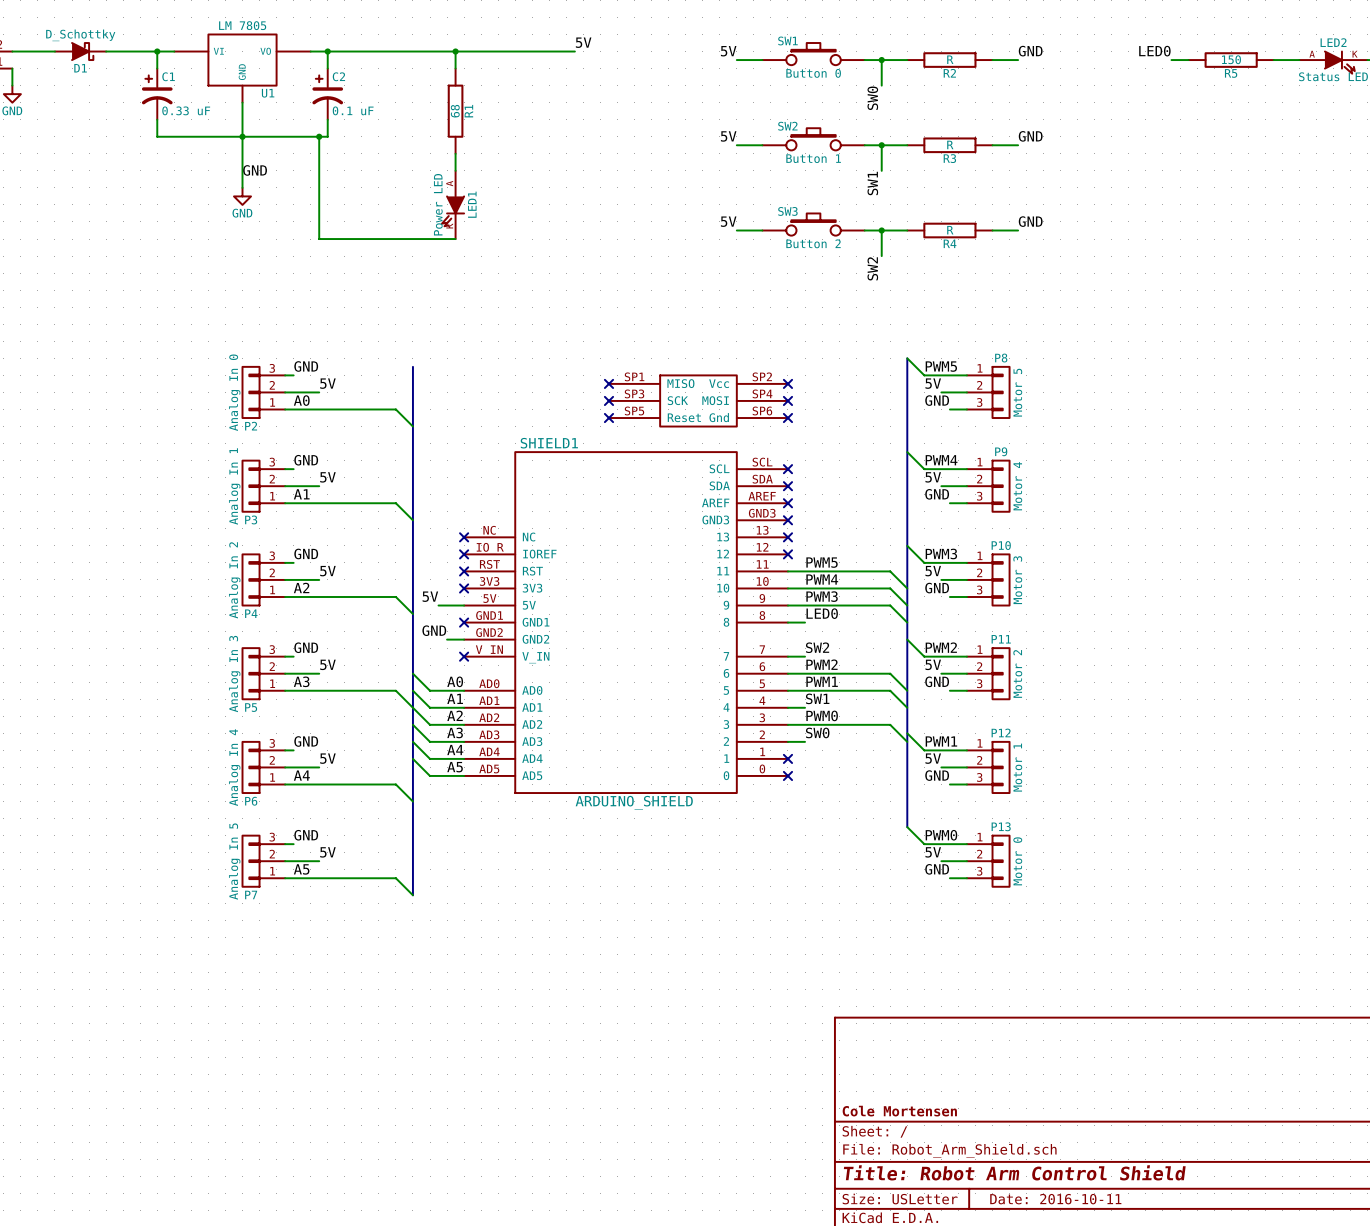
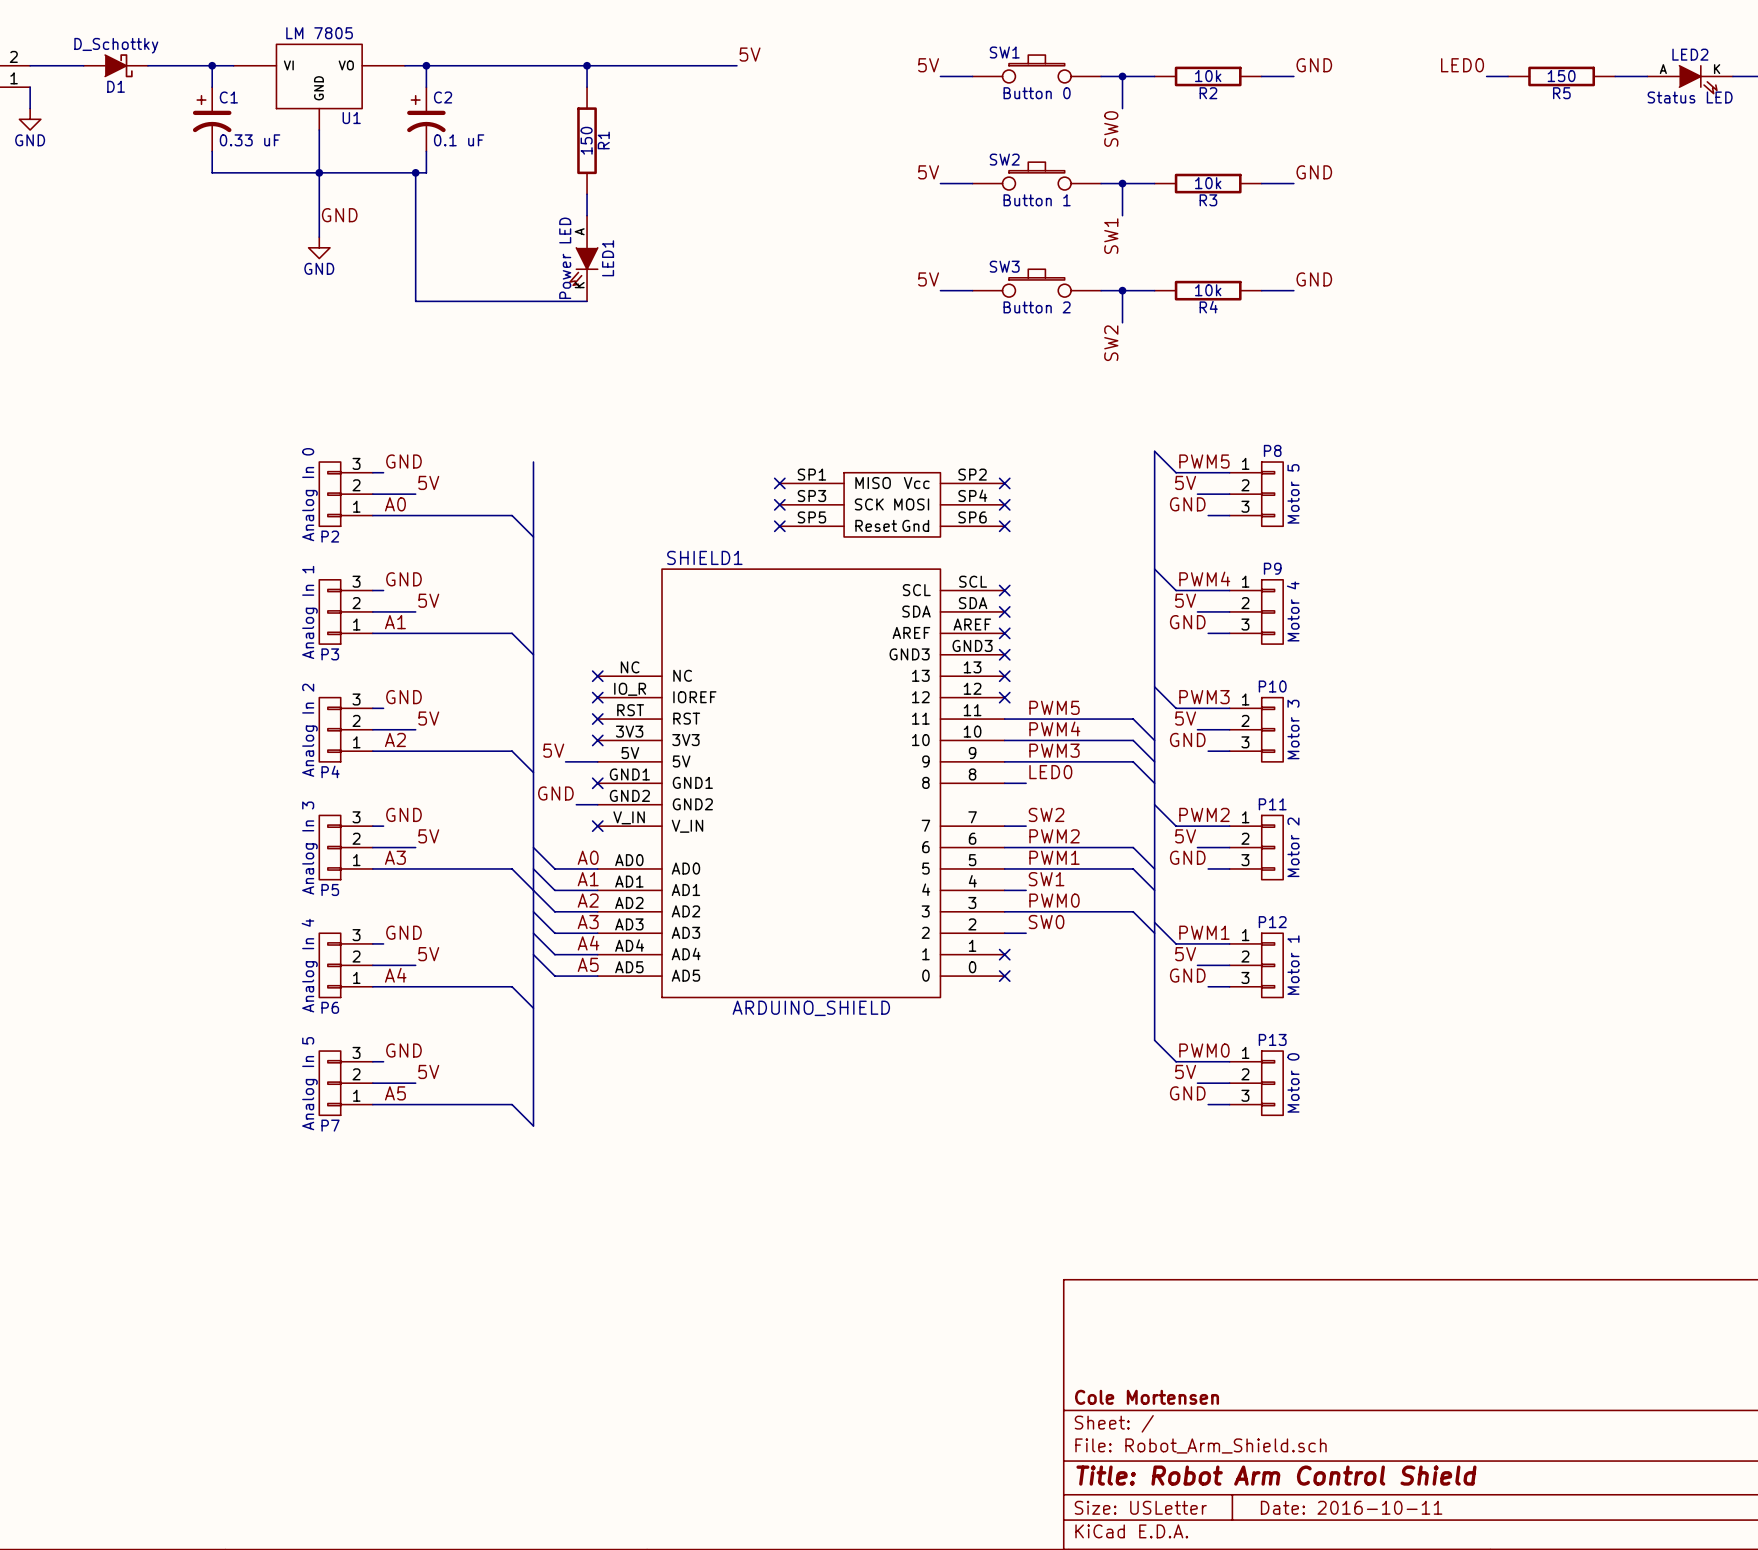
R2 value: R (950, 59) -> 10k (1208, 76)
R1 value: 68 (455, 111) -> 150 (586, 140)
R3 value: R (950, 144) -> 10k (1208, 183)
R4 value: R (950, 230) -> 10k (1208, 290)

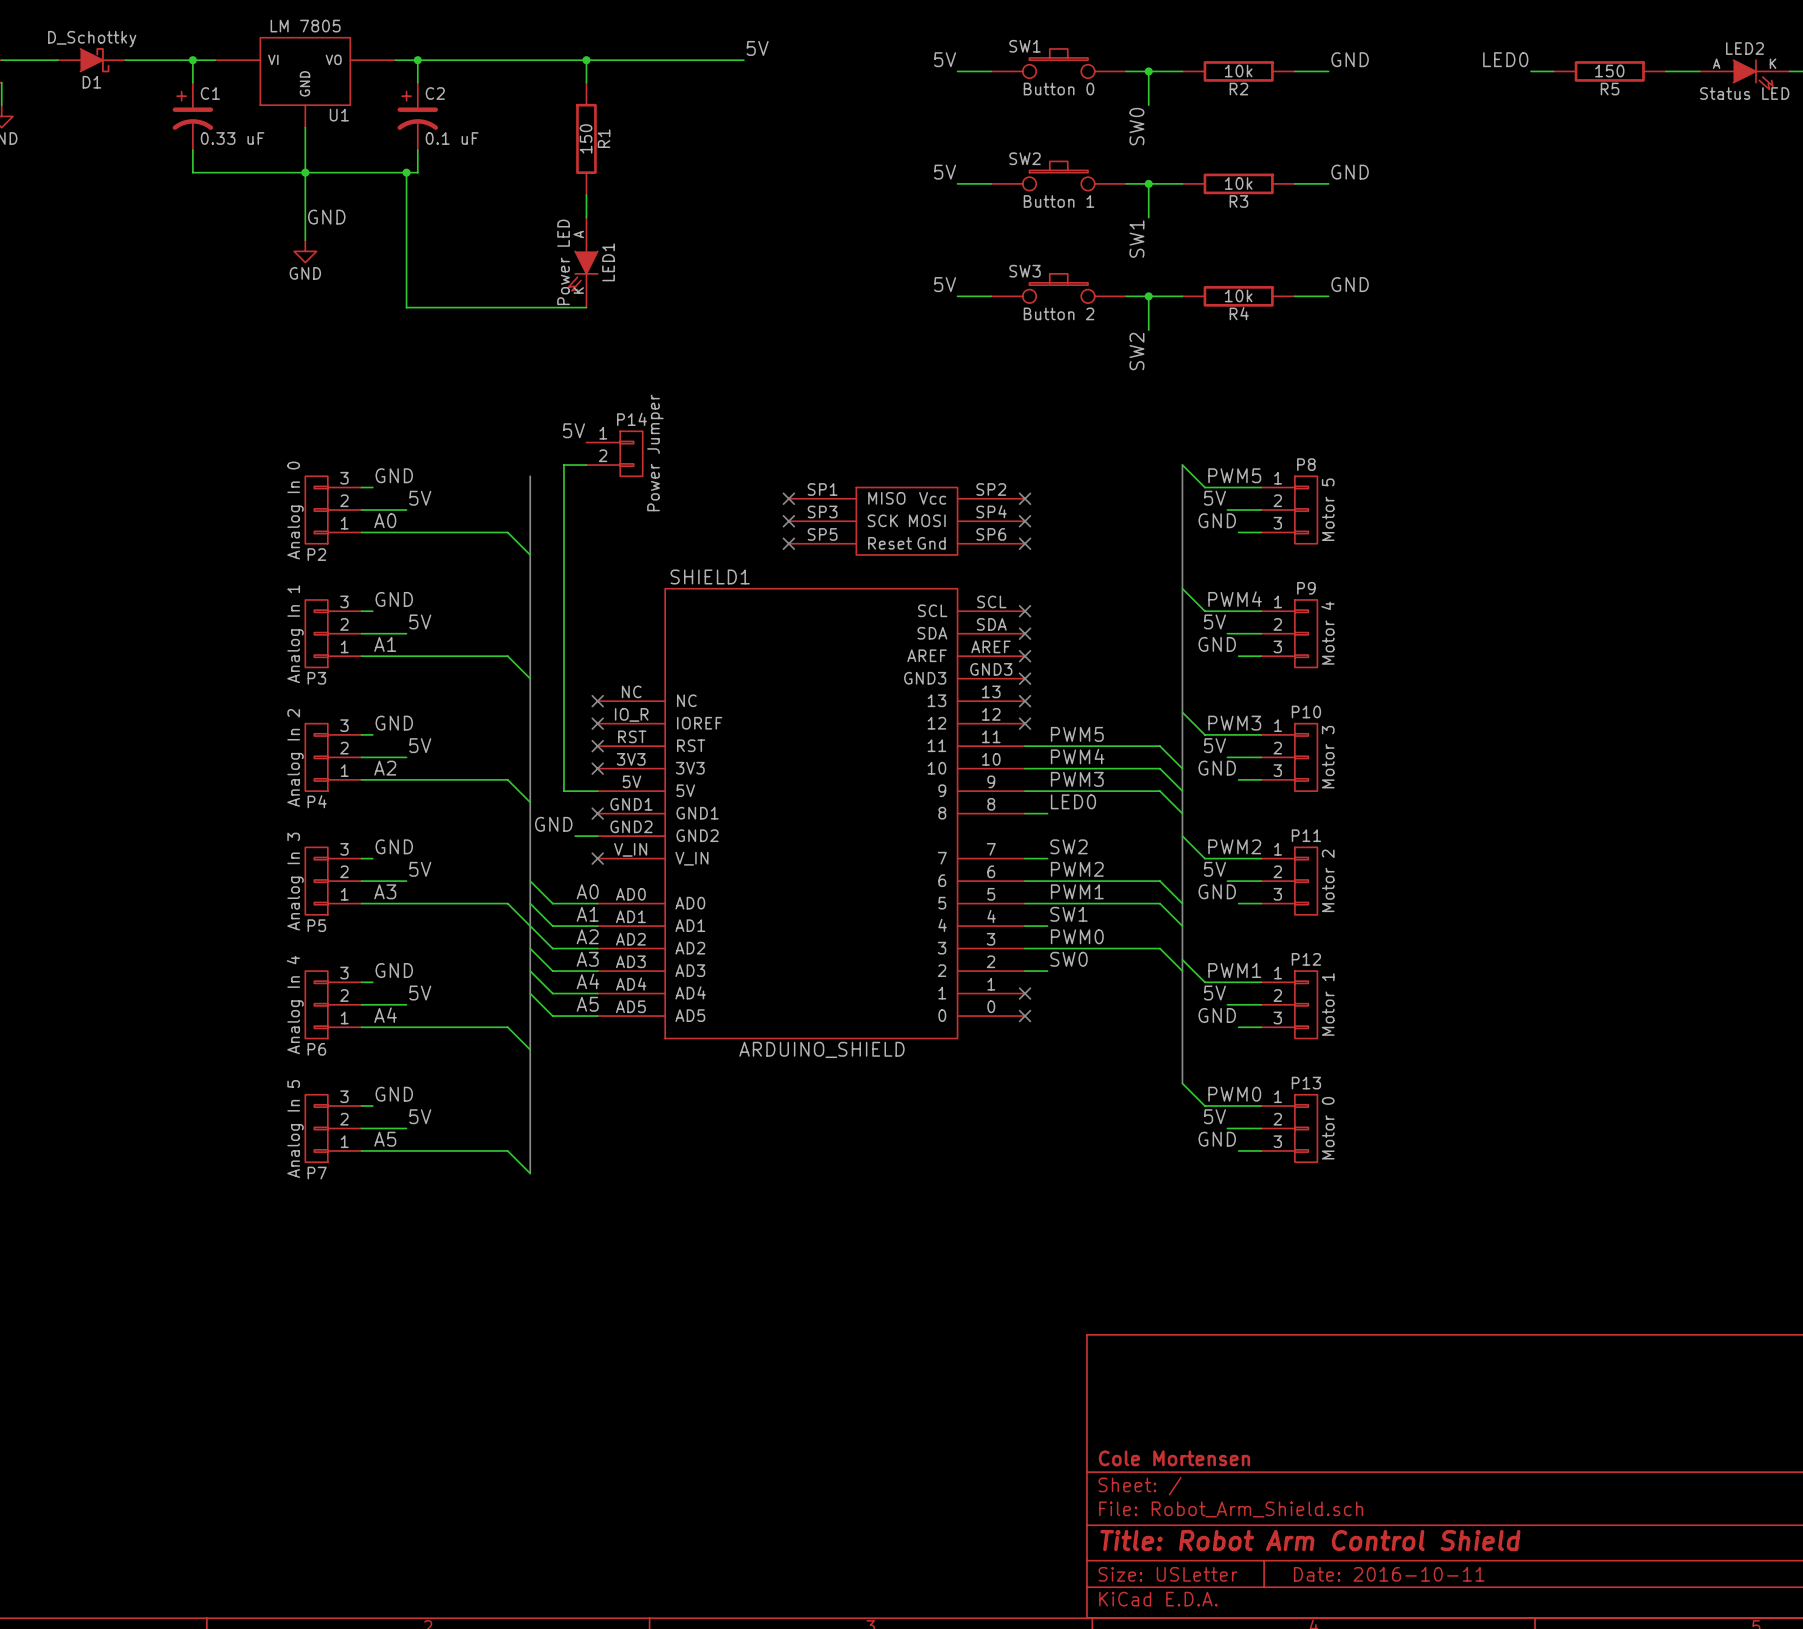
label: none -> 5V (574, 430)
P14: none -> Power Jumper (614, 453)
wire: none -> (586, 465) (563, 465) (563, 791)
label: 5V (553, 750) -> none

